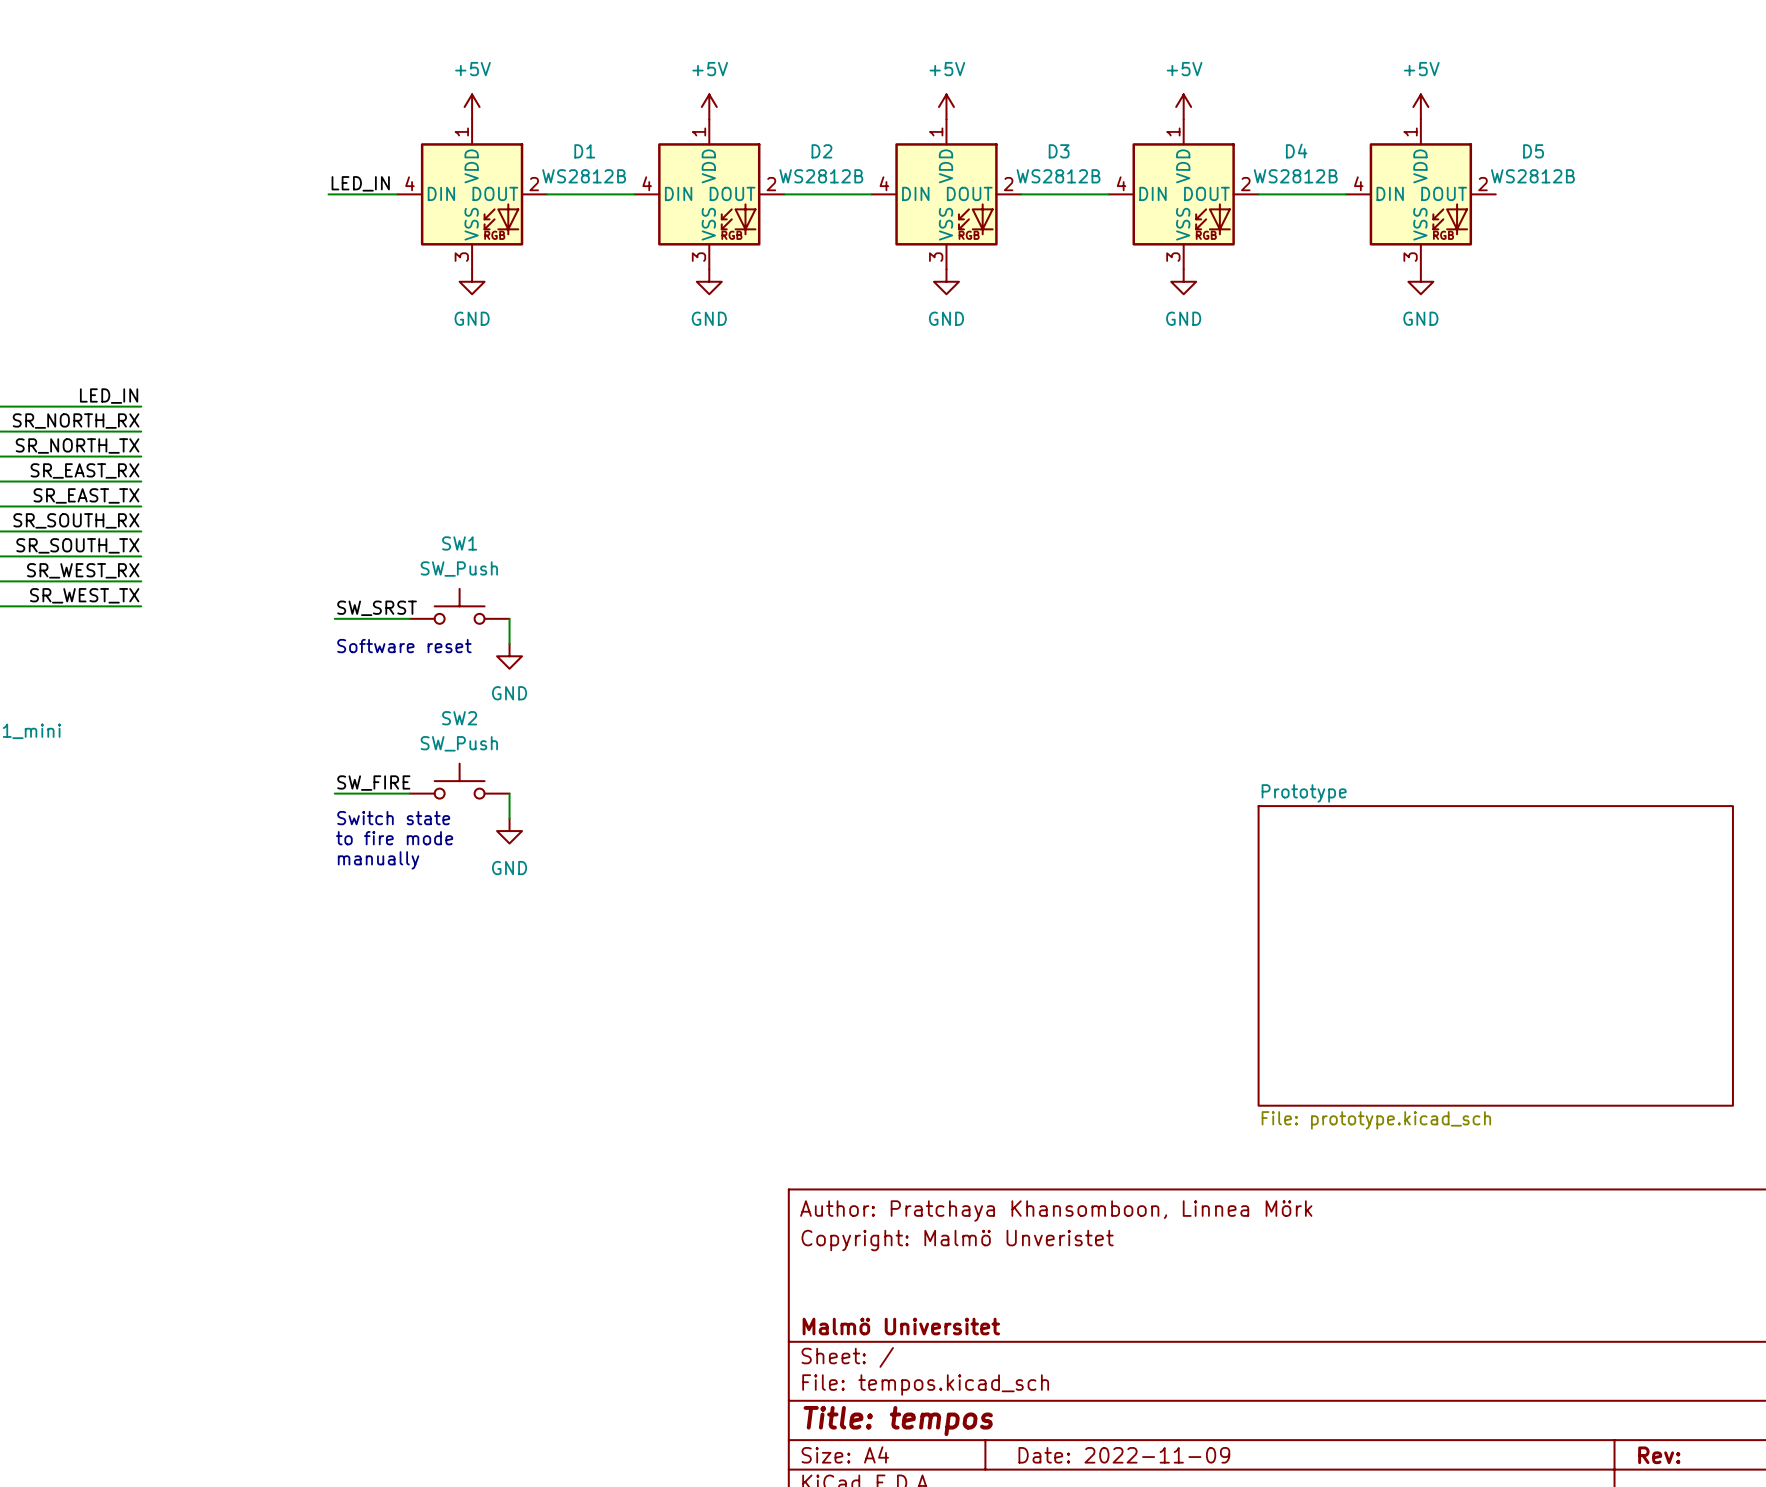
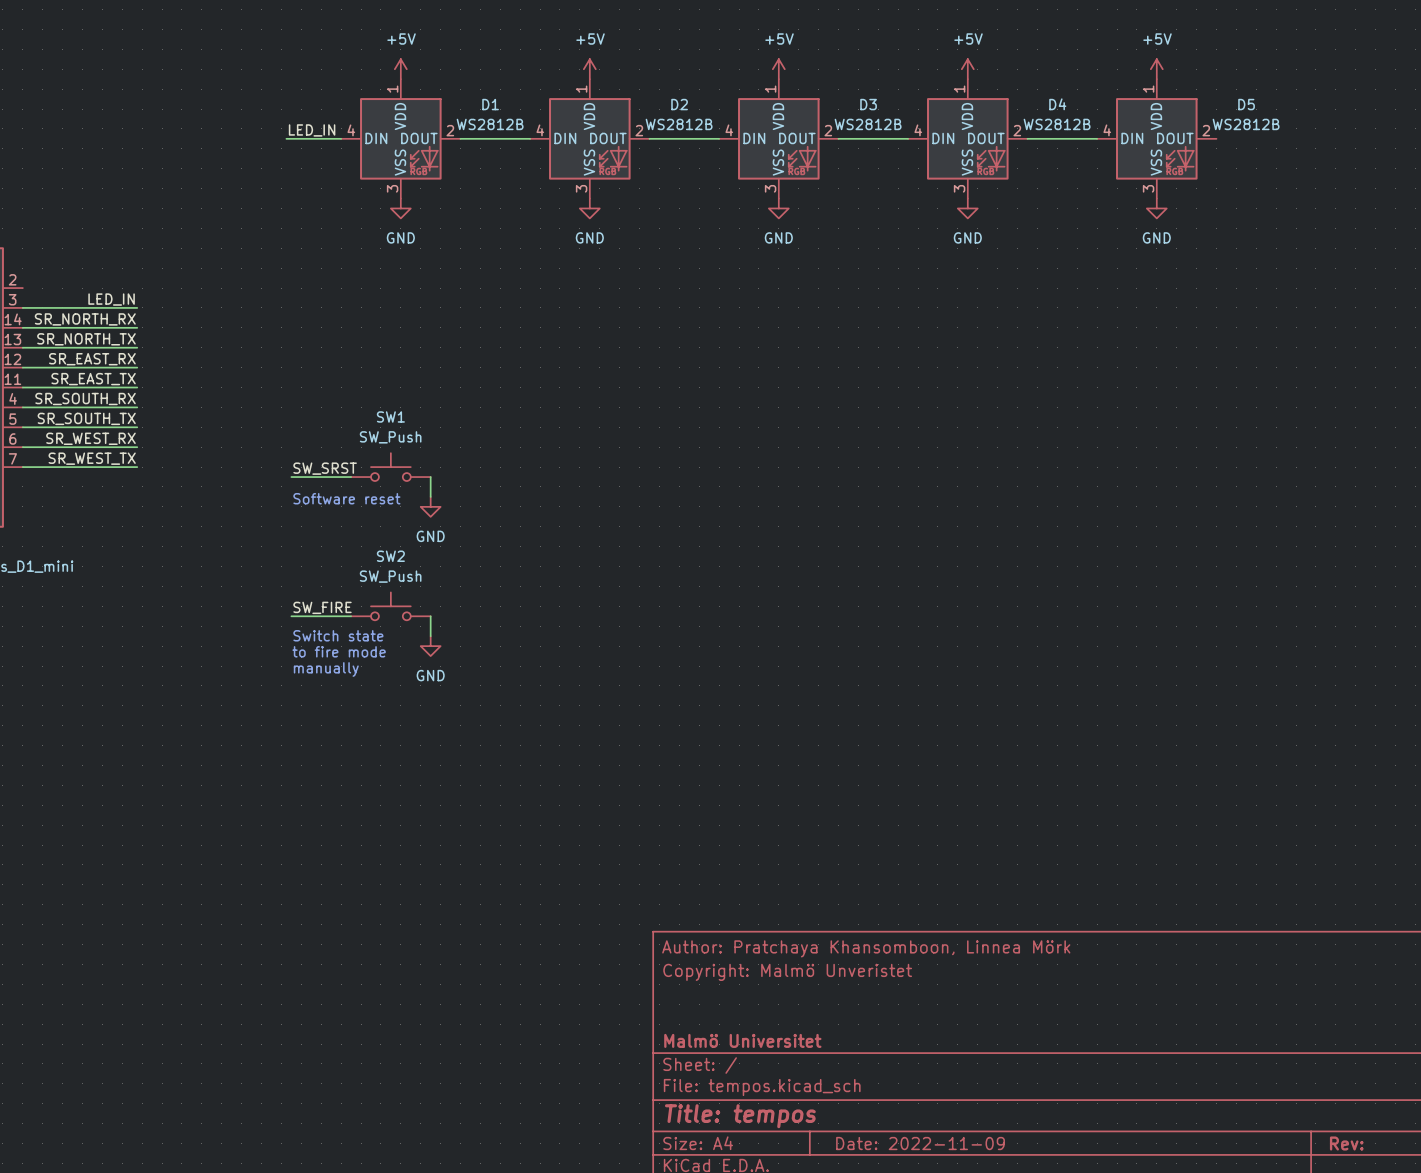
sheet Prototype: File: prototype.kicad_sch (1495, 955) -> none

